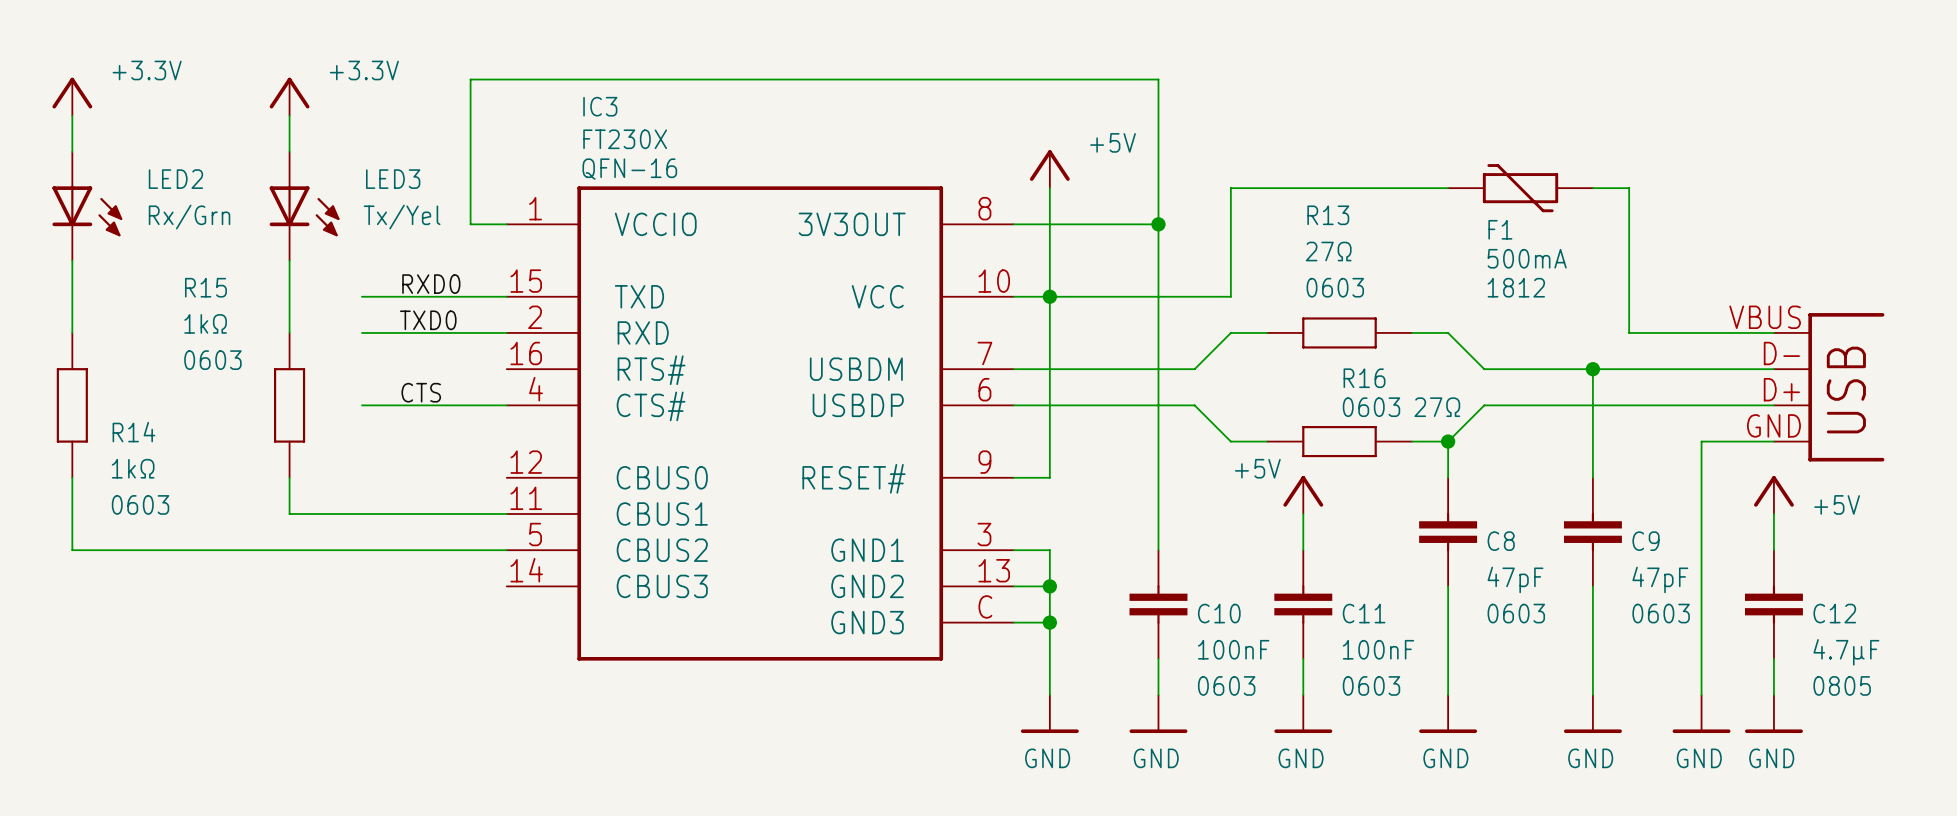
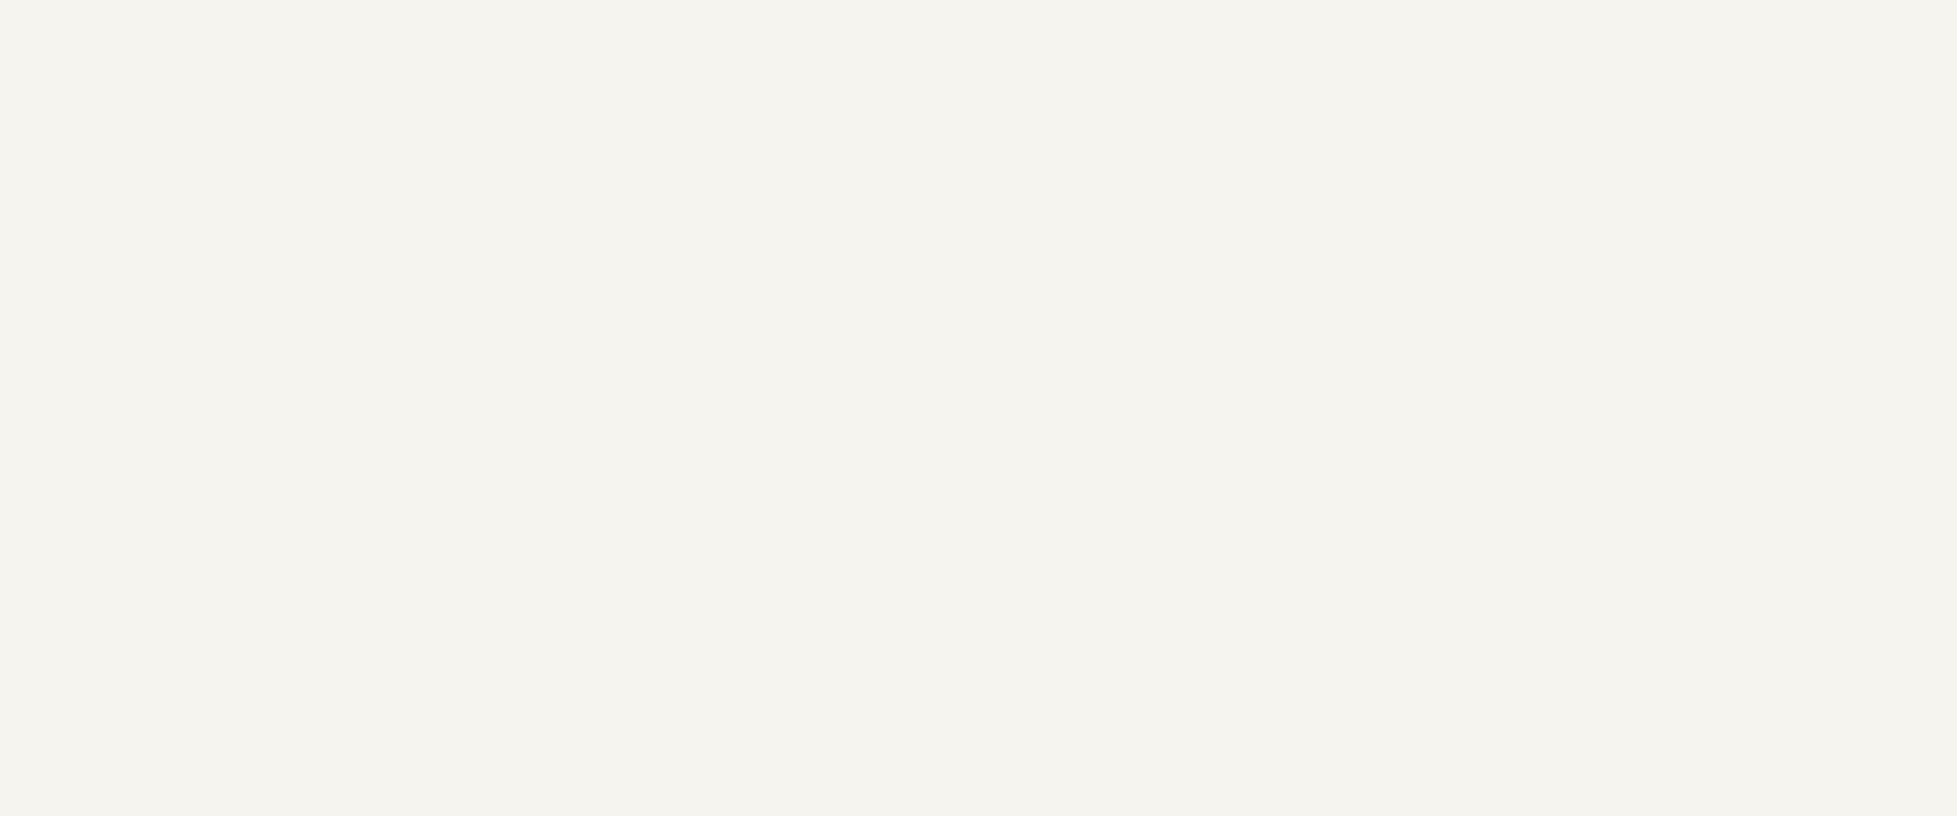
power symbol: +3.3V (72, 96) -> none
power symbol: +3.3V (289, 96) -> none
wire: (72, 115) (72, 151) -> none
wire: (289, 115) (289, 151) -> none
text: FT230X (625, 139) -> none
power symbol: +5V (1049, 169) -> none
wire: (1049, 188) (1049, 477) (1013, 477) -> none
wire: (1448, 188) (1230, 188) (1230, 296) (1013, 296) -> none
F1: 500mA (1520, 188) -> none
wire: (1592, 188) (1629, 188) (1629, 332) (1773, 332) -> none
LED2: Rx/Grn (87, 206) -> none
LED3: Tx/Yel (304, 206) -> none
wire: (506, 224) (470, 224) (470, 79) (1158, 79) (1158, 550) -> none
wire: (1013, 224) (1158, 224) -> none
junction: (1158, 224) -> none
wire: (72, 260) (72, 332) -> none
wire: (289, 260) (289, 332) -> none
label: RXD0 (431, 284) -> none
wire: (361, 296) (506, 296) -> none
junction: (1049, 296) -> none
label: TXD0 (428, 320) -> none
wire: (361, 332) (506, 332) -> none
wire: (1267, 332) (1230, 332) (1194, 369) (1013, 369) -> none
R13: 27Ω (1339, 332) -> none
wire: (1411, 332) (1448, 332) (1484, 369) (1773, 369) -> none
wire: (1592, 369) (1592, 477) -> none
junction: (1592, 369) -> none
part: (1829, 387) -> none
label: CTS (421, 392) -> none
R14: 1kΩ (72, 405) -> none
R15: 1kΩ (289, 405) -> none
wire: (361, 405) (506, 405) -> none
wire: (1013, 405) (1194, 405) (1230, 441) (1267, 441) -> none
wire: (1773, 405) (1484, 405) (1448, 441) -> none
IC3: (760, 423) -> none
R16: 27Ω (1339, 441) -> none
wire: (1411, 441) (1448, 441) -> none
wire: (1448, 441) (1448, 477) -> none
junction: (1448, 441) -> none
wire: (1773, 441) (1701, 441) (1701, 695) -> none
wire: (72, 477) (72, 550) (506, 550) -> none
wire: (289, 477) (289, 513) (506, 513) -> none
power symbol: +5V (1303, 494) -> none
power symbol: +5V (1773, 494) -> none
wire: (1303, 513) (1303, 550) -> none
wire: (1773, 513) (1773, 550) -> none
C8: 47pF (1448, 532) -> none
C9: 47pF (1592, 532) -> none
wire: (1013, 550) (1049, 550) (1049, 695) -> none
wire: (1013, 586) (1049, 586) -> none
junction: (1049, 586) -> none
wire: (1448, 586) (1448, 695) -> none
wire: (1592, 586) (1592, 695) -> none
C10: 100nF (1158, 604) -> none
C11: 100nF (1303, 604) -> none
C12: 4.7µF (1773, 604) -> none
wire: (1013, 622) (1049, 622) -> none
junction: (1049, 622) -> none
wire: (1158, 658) (1158, 695) -> none
wire: (1303, 658) (1303, 695) -> none
wire: (1773, 658) (1773, 695) -> none
power symbol: GND (1049, 714) -> none
power symbol: GND (1158, 714) -> none
power symbol: GND (1303, 714) -> none
power symbol: GND (1448, 714) -> none
power symbol: GND (1592, 714) -> none
power symbol: GND (1701, 714) -> none
power symbol: GND (1773, 714) -> none

